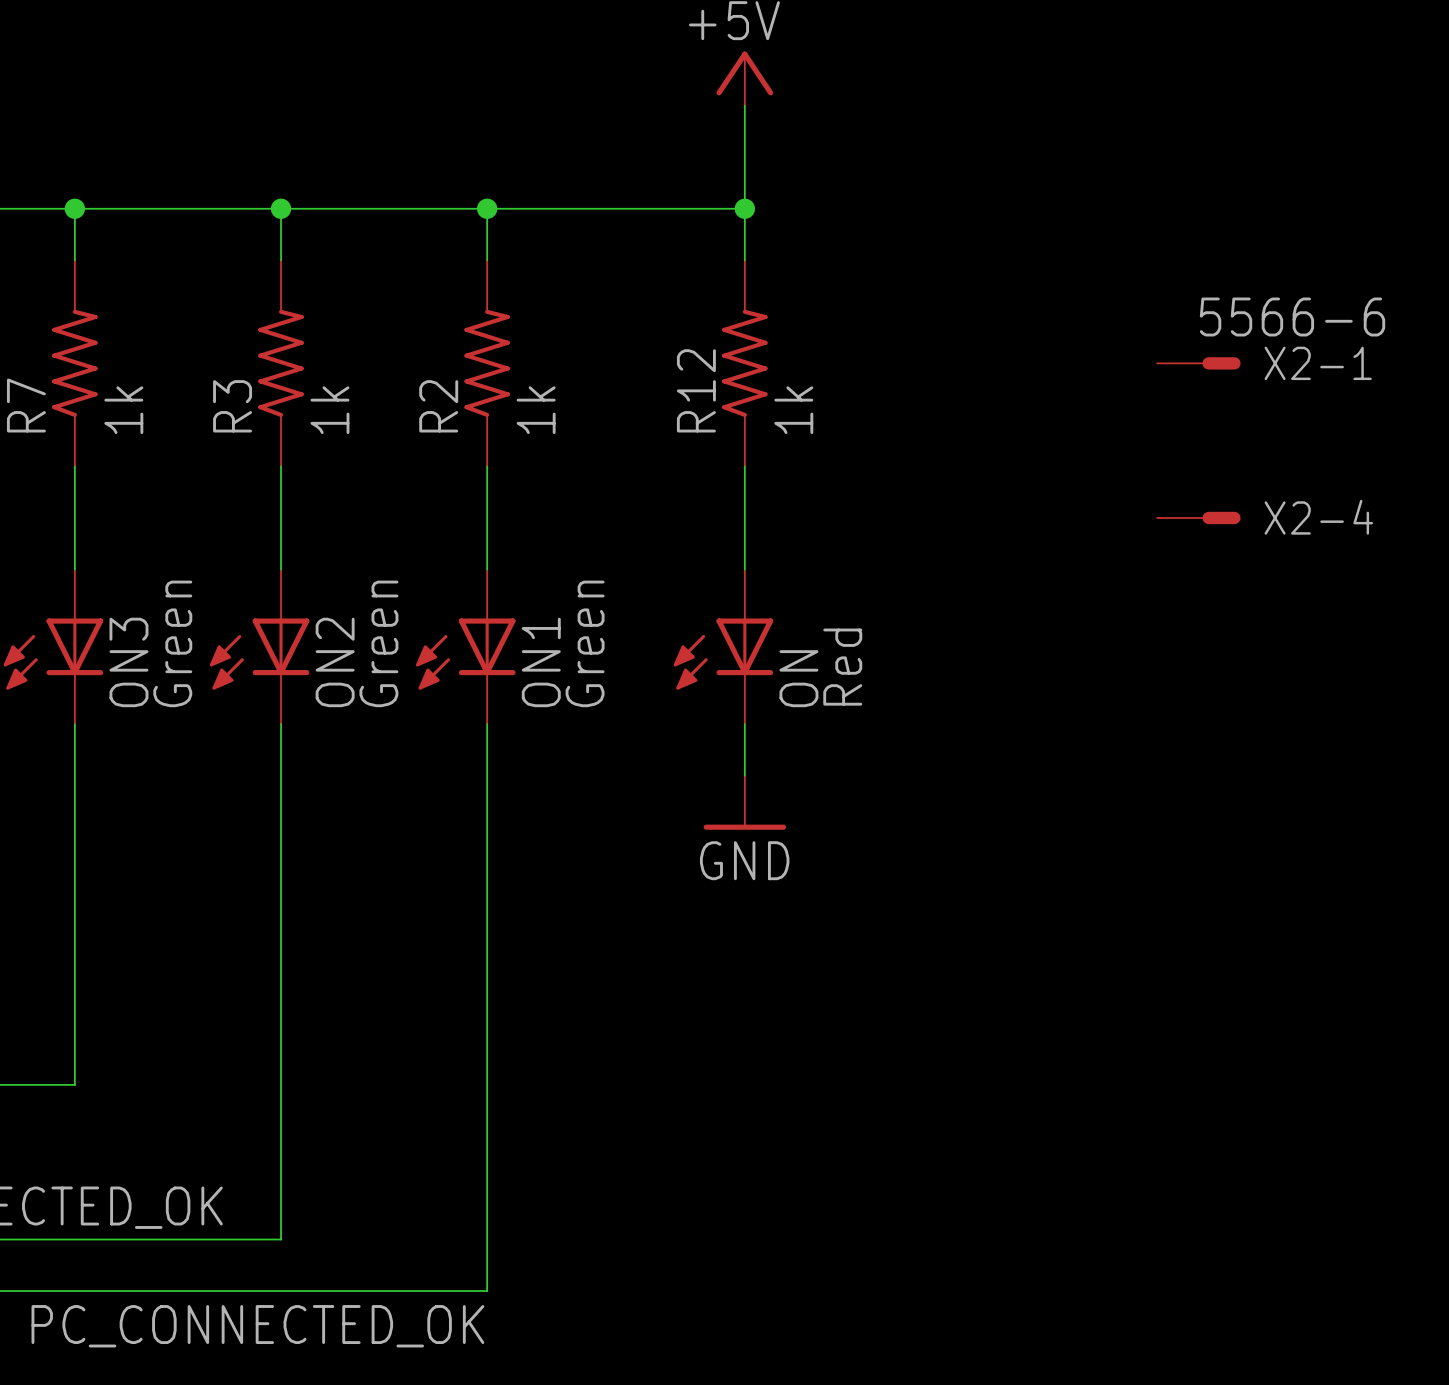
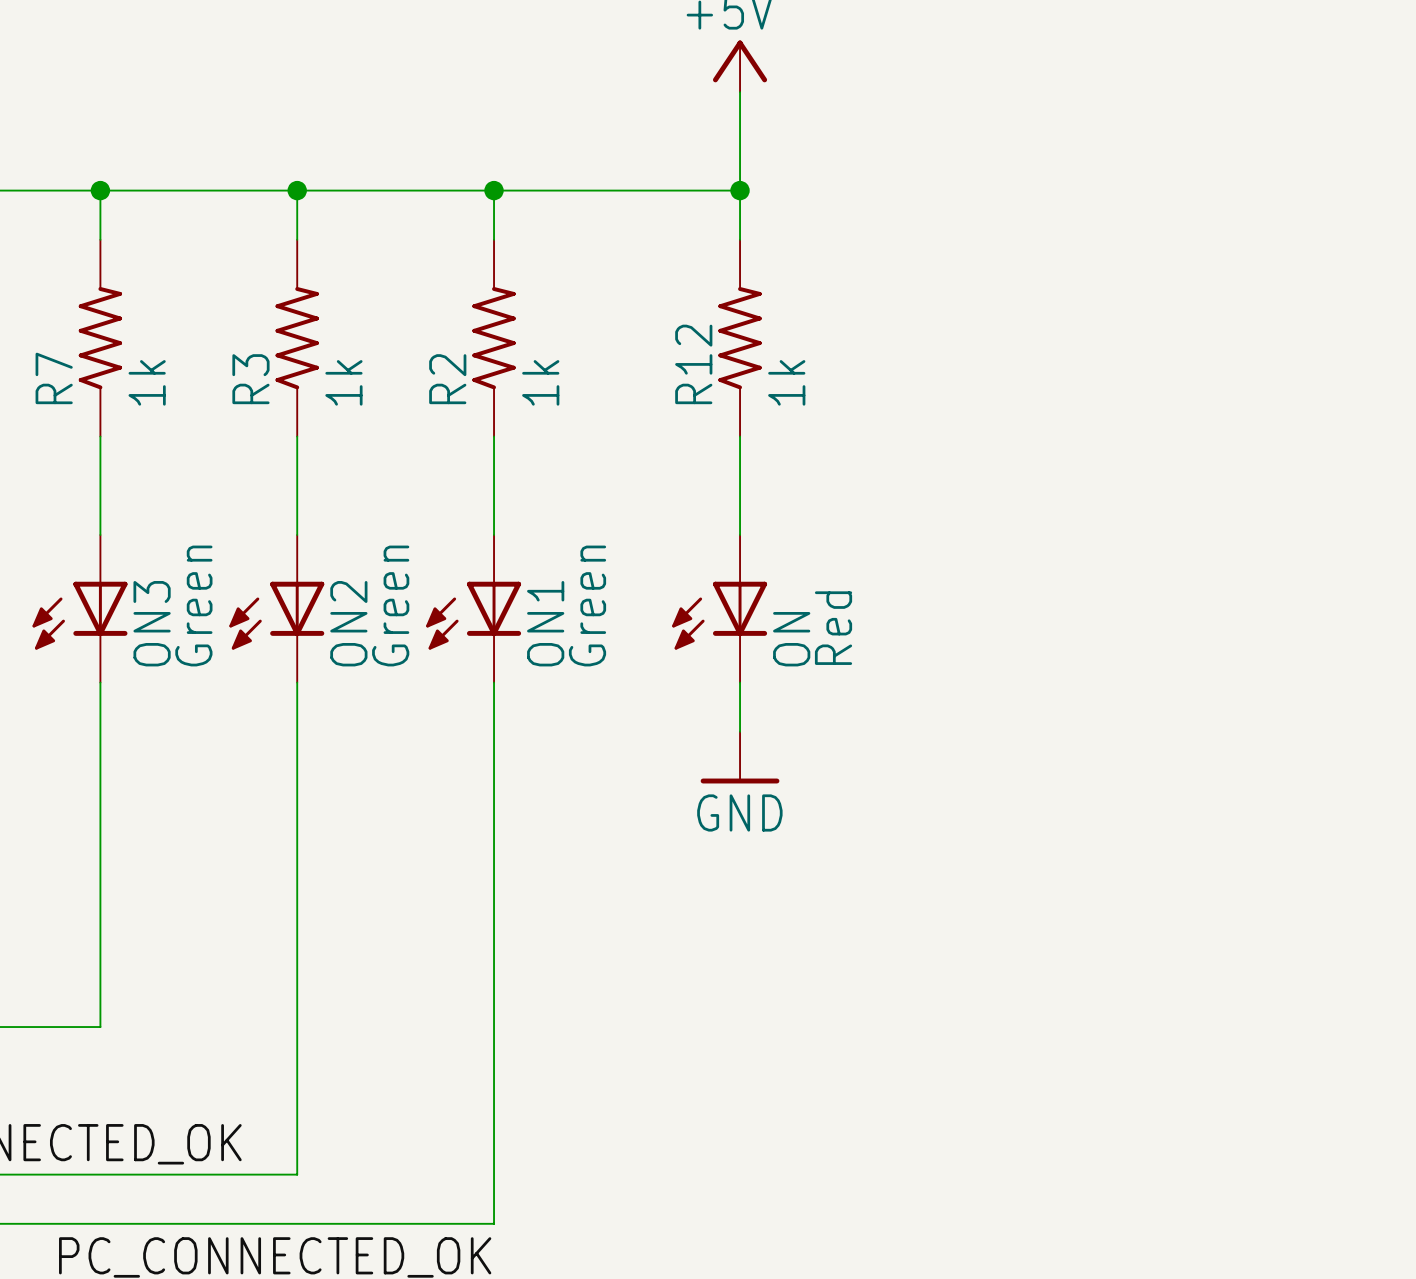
X2-1: 5566-6 (1198, 363) -> none
X2-4: (1198, 517) -> none

